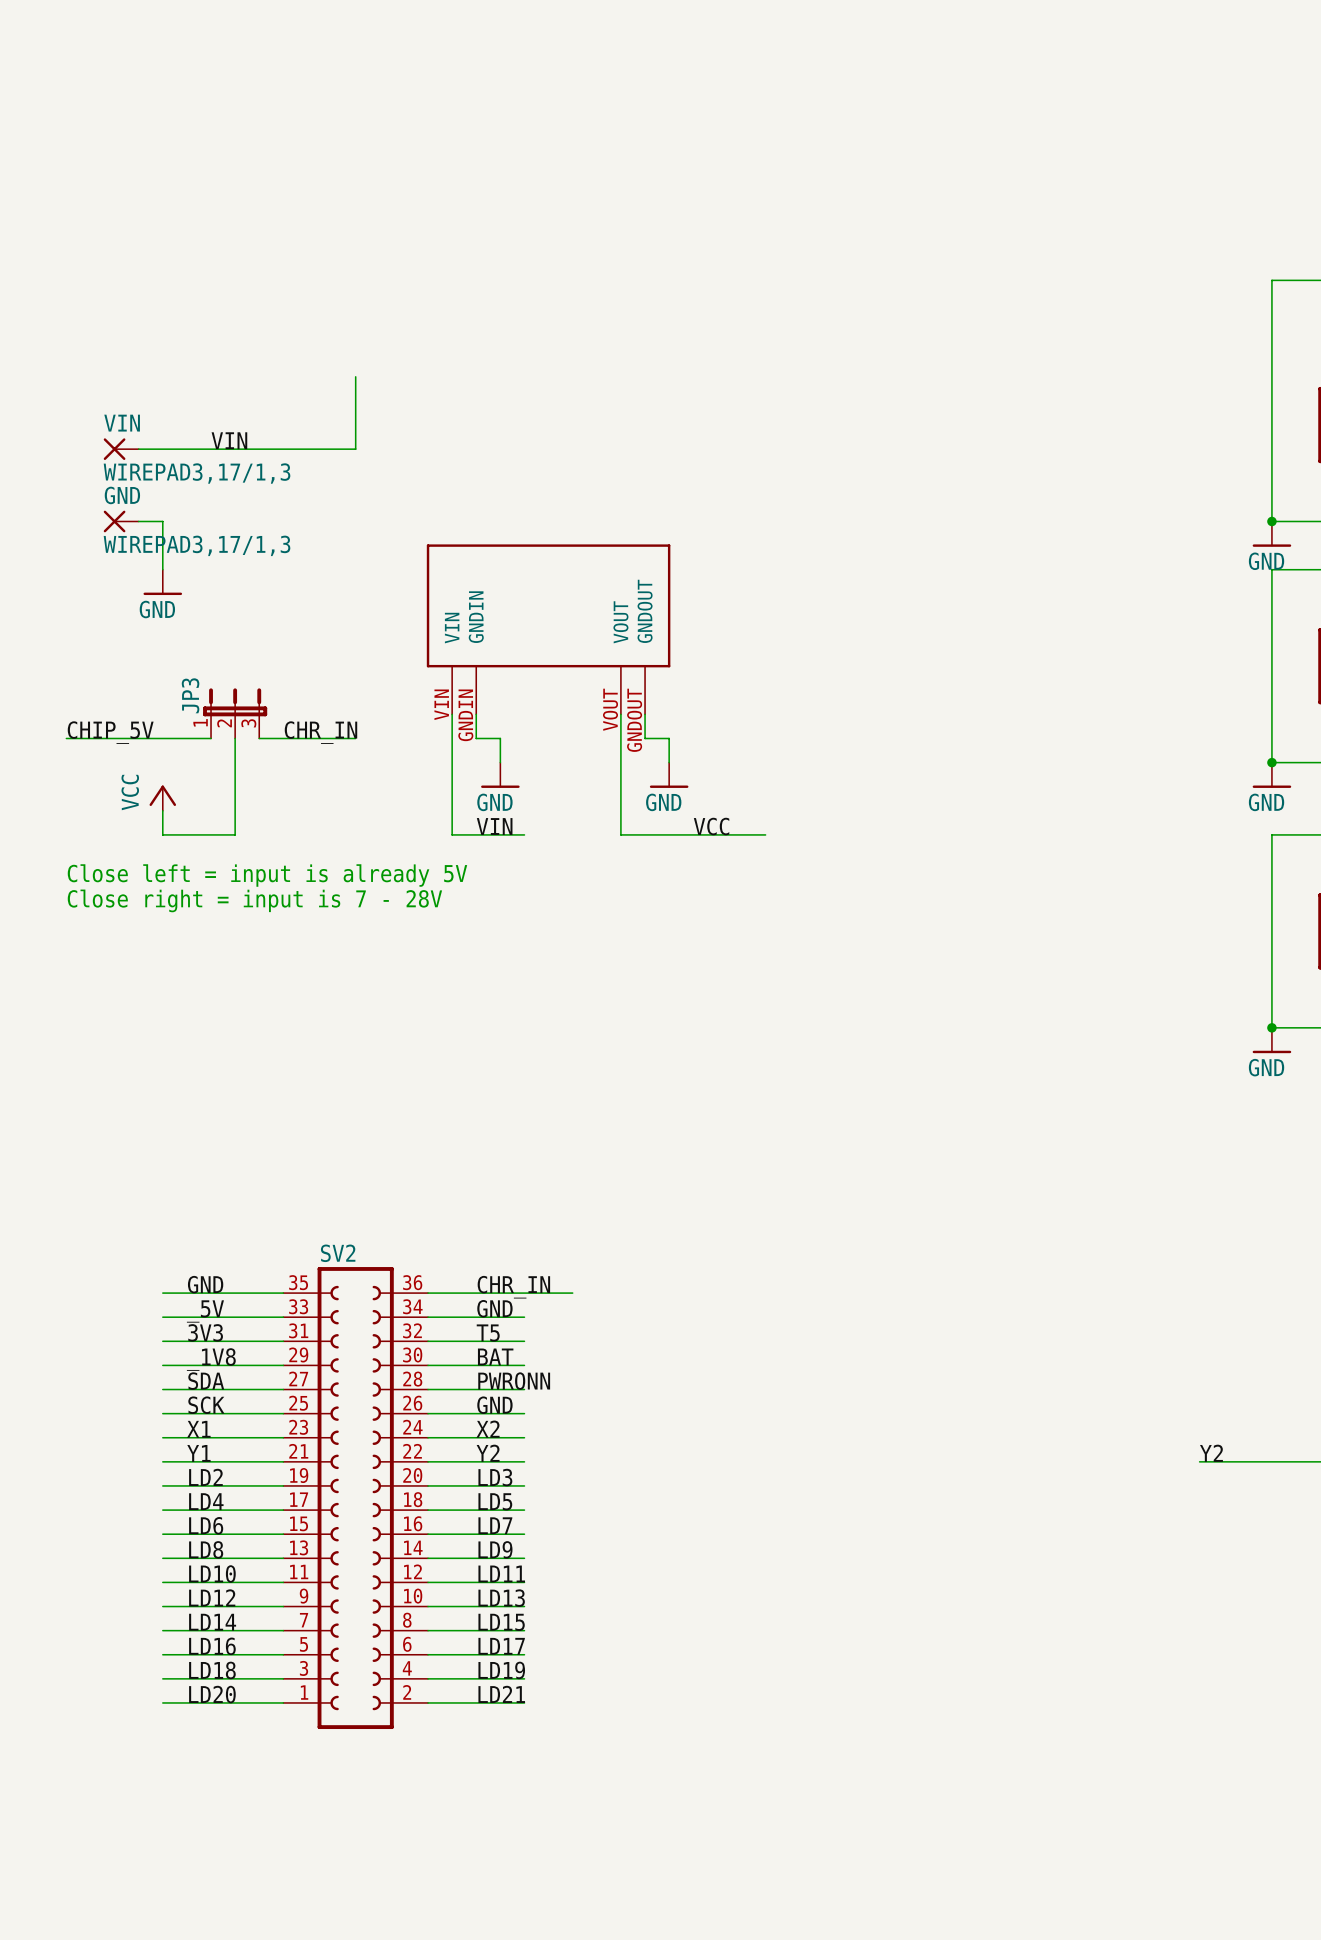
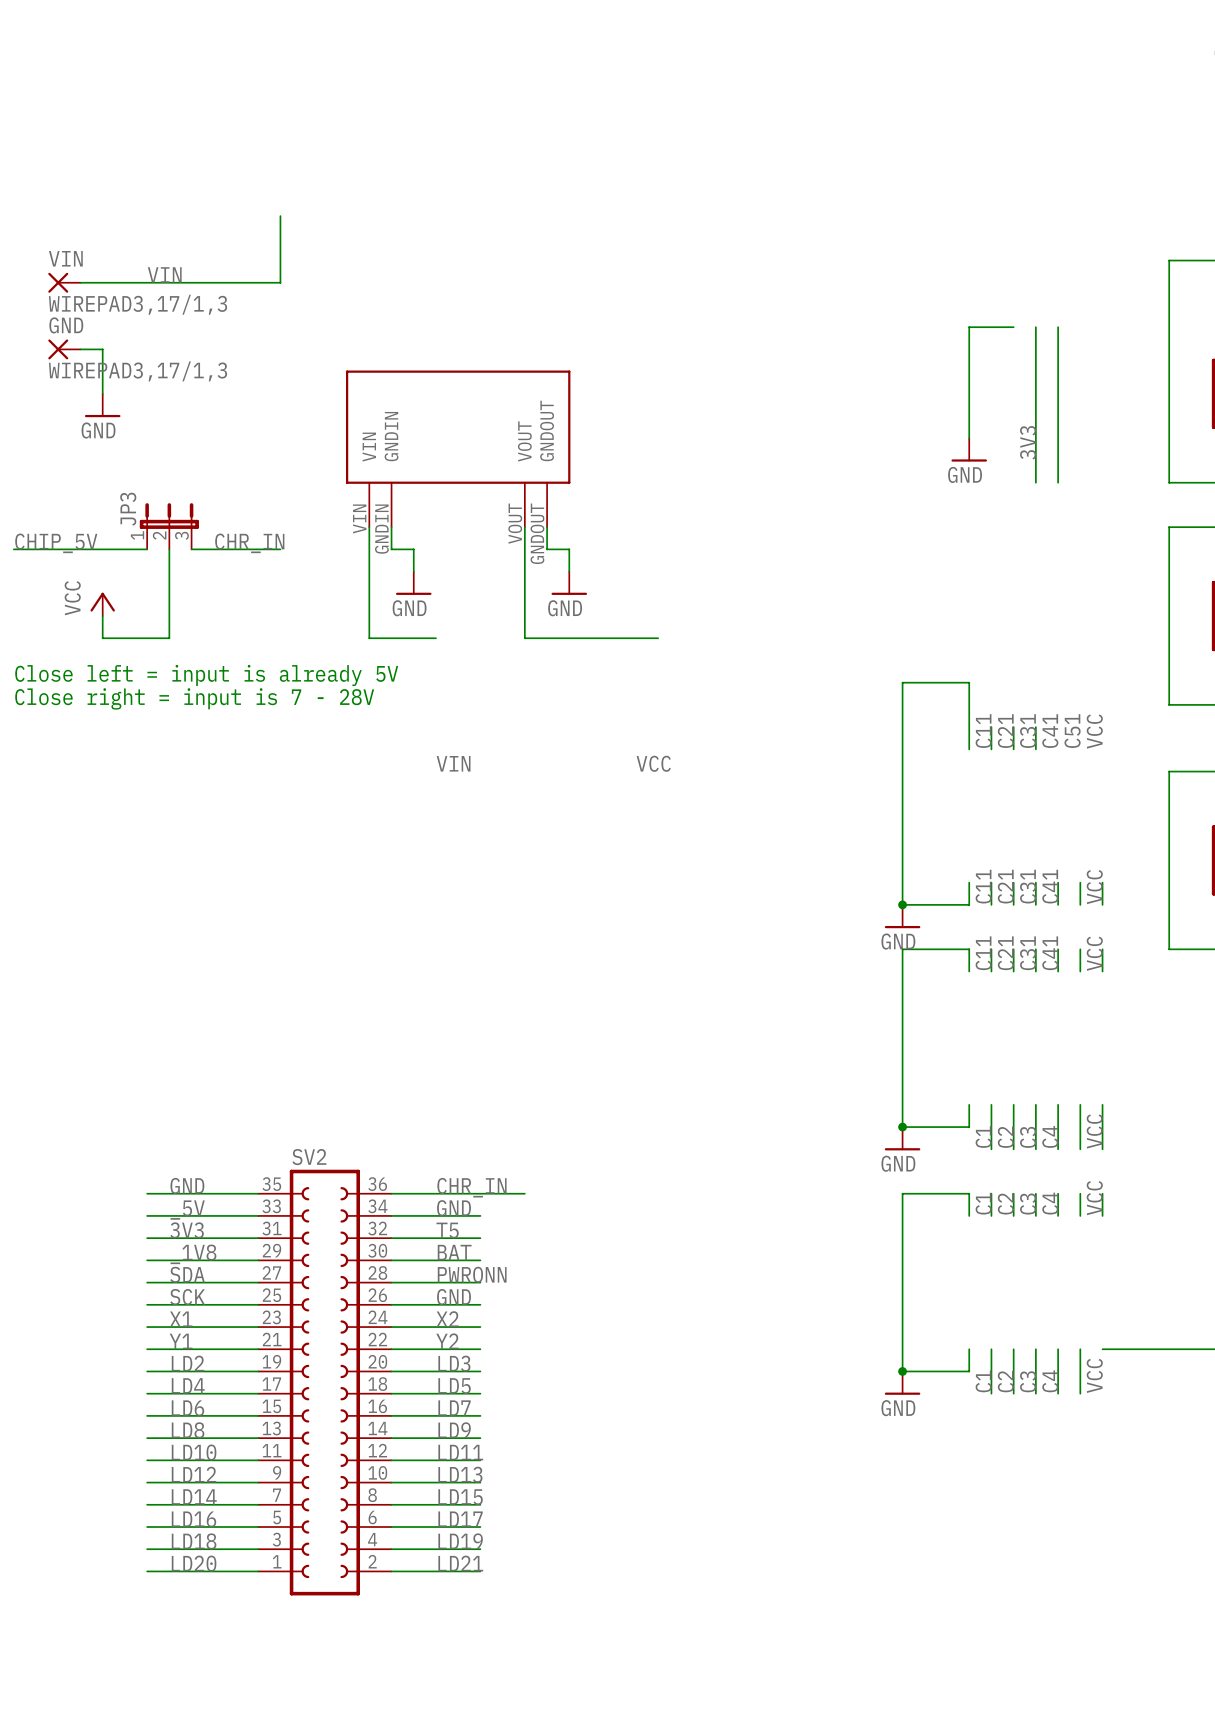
wire: none -> (1013, 327) (969, 327) (969, 438)
wire: none -> (1035, 327) (1035, 482)
wire: none -> (1058, 327) (1058, 482)
wire: (355, 376) (355, 449) (138, 449) -> (280, 216) (280, 282) (80, 282)
power symbol: none -> GND (102, 405)
label position: VIN (229, 440) -> VIN (164, 274)
VIN position: (121, 449) -> (64, 282)
label: none -> 3V3 (1028, 442)
power symbol: none -> GND (969, 449)
GND position: (121, 521) -> (64, 349)
wire: (138, 521) (162, 521) (162, 569) -> (80, 349) (102, 349) (102, 393)
junction: (1271, 521) -> none
power symbol: GND (1271, 534) -> none
power symbol: GND (162, 582) -> none
part position: (548, 629) -> (458, 448)
power symbol: none -> GND (413, 583)
power symbol: none -> GND (569, 583)
JP3 position: (235, 713) -> (169, 526)
wire: (452, 714) (452, 834) (524, 834) -> (369, 527) (369, 638) (435, 638)
wire: (476, 714) (476, 738) (500, 738) (500, 762) -> (391, 527) (391, 549) (413, 549) (413, 571)
wire: (620, 714) (620, 834) (765, 834) -> (524, 527) (524, 638) (658, 638)
wire: (645, 714) (645, 738) (669, 738) (669, 762) -> (547, 527) (547, 549) (569, 549) (569, 571)
label position: CHIP_5V (110, 732) -> CHIP_5V (56, 543)
label position: CHR_IN (320, 732) -> CHR_IN (249, 543)
wire: (66, 738) (211, 738) -> (13, 549) (147, 549)
wire: (235, 738) (235, 834) (162, 834) (162, 810) -> (169, 549) (169, 638) (102, 638) (102, 616)
wire: (259, 738) (355, 738) -> (191, 549) (280, 549)
junction: (1271, 762) -> none
power symbol: GND (500, 775) -> none
power symbol: GND (669, 775) -> none
power symbol: GND (1271, 775) -> none
wire: none -> (991, 727) (991, 749)
wire: none -> (1013, 727) (1013, 749)
wire: none -> (1035, 727) (1035, 749)
label: none -> C11 (983, 731)
label: none -> C21 (1005, 731)
label: none -> C31 (1028, 731)
label: none -> C41 (1050, 731)
label: none -> C51 (1072, 731)
label: none -> VCC (1094, 731)
power symbol position: VCC (162, 798) -> VCC (102, 604)
wire: none -> (969, 749) (969, 682) (902, 682) (902, 904) (969, 904) (969, 882)
text position: Close left = input is already 5V (267, 875) -> Close left = input is already 5V (206, 675)
text position: Close right = input is 7 - 28V (254, 900) -> Close right = input is 7 - 28V (194, 698)
wire: none -> (991, 882) (991, 904)
wire: none -> (1013, 882) (1013, 904)
wire: none -> (1035, 882) (1035, 904)
wire: none -> (1058, 882) (1058, 904)
wire: none -> (1080, 882) (1080, 904)
wire: none -> (1102, 882) (1102, 904)
label: none -> C11 (983, 886)
label: none -> C21 (1005, 886)
label: none -> C31 (1028, 886)
label: none -> C41 (1050, 886)
label: none -> VCC (1094, 887)
junction: none -> (902, 904)
power symbol: none -> GND (902, 916)
wire: none -> (991, 949) (991, 971)
wire: none -> (1013, 949) (1013, 971)
wire: none -> (1035, 949) (1035, 971)
wire: none -> (1058, 949) (1058, 971)
wire: none -> (1080, 949) (1080, 971)
wire: none -> (1102, 949) (1102, 971)
junction: (1271, 1027) -> none
label: none -> C11 (983, 953)
label: none -> C21 (1005, 953)
label: none -> C31 (1028, 953)
label: none -> C41 (1050, 953)
label: none -> VCC (1094, 953)
power symbol: GND (1271, 1040) -> none
wire: none -> (969, 971) (969, 949) (902, 949) (902, 1127) (969, 1127) (969, 1104)
wire: none -> (991, 1104) (991, 1149)
wire: none -> (1013, 1104) (1013, 1149)
wire: none -> (1035, 1104) (1035, 1149)
wire: none -> (1058, 1104) (1058, 1149)
wire: none -> (1080, 1104) (1080, 1149)
wire: none -> (1102, 1104) (1102, 1149)
junction: none -> (902, 1127)
label: none -> VCC (1094, 1131)
label: none -> C1 (983, 1137)
label: none -> C2 (1005, 1137)
label: none -> C3 (1028, 1137)
label: none -> C4 (1050, 1136)
power symbol: none -> GND (902, 1138)
wire: none -> (991, 1193) (991, 1215)
wire: none -> (1013, 1193) (1013, 1215)
wire: none -> (1035, 1193) (1035, 1215)
wire: none -> (1058, 1193) (1058, 1215)
wire: none -> (1080, 1193) (1080, 1215)
wire: none -> (1102, 1193) (1102, 1215)
label: none -> VCC (1094, 1198)
label: none -> C1 (983, 1203)
label: none -> C2 (1005, 1203)
label: none -> C3 (1028, 1204)
label: none -> C4 (1050, 1203)
wire: none -> (969, 1215) (969, 1193) (902, 1193) (902, 1371) (969, 1371) (969, 1349)
label: Y2 (1211, 1453) -> none
wire: none -> (991, 1349) (991, 1393)
wire: none -> (1013, 1349) (1013, 1393)
wire: none -> (1035, 1349) (1035, 1393)
wire: none -> (1058, 1349) (1058, 1393)
wire: none -> (1080, 1349) (1080, 1393)
junction: none -> (902, 1371)
label: none -> VCC (1094, 1375)
label: none -> C1 (983, 1381)
label: none -> C2 (1005, 1381)
label: none -> C3 (1028, 1381)
label: none -> C4 (1050, 1381)
power symbol: none -> GND (902, 1383)

